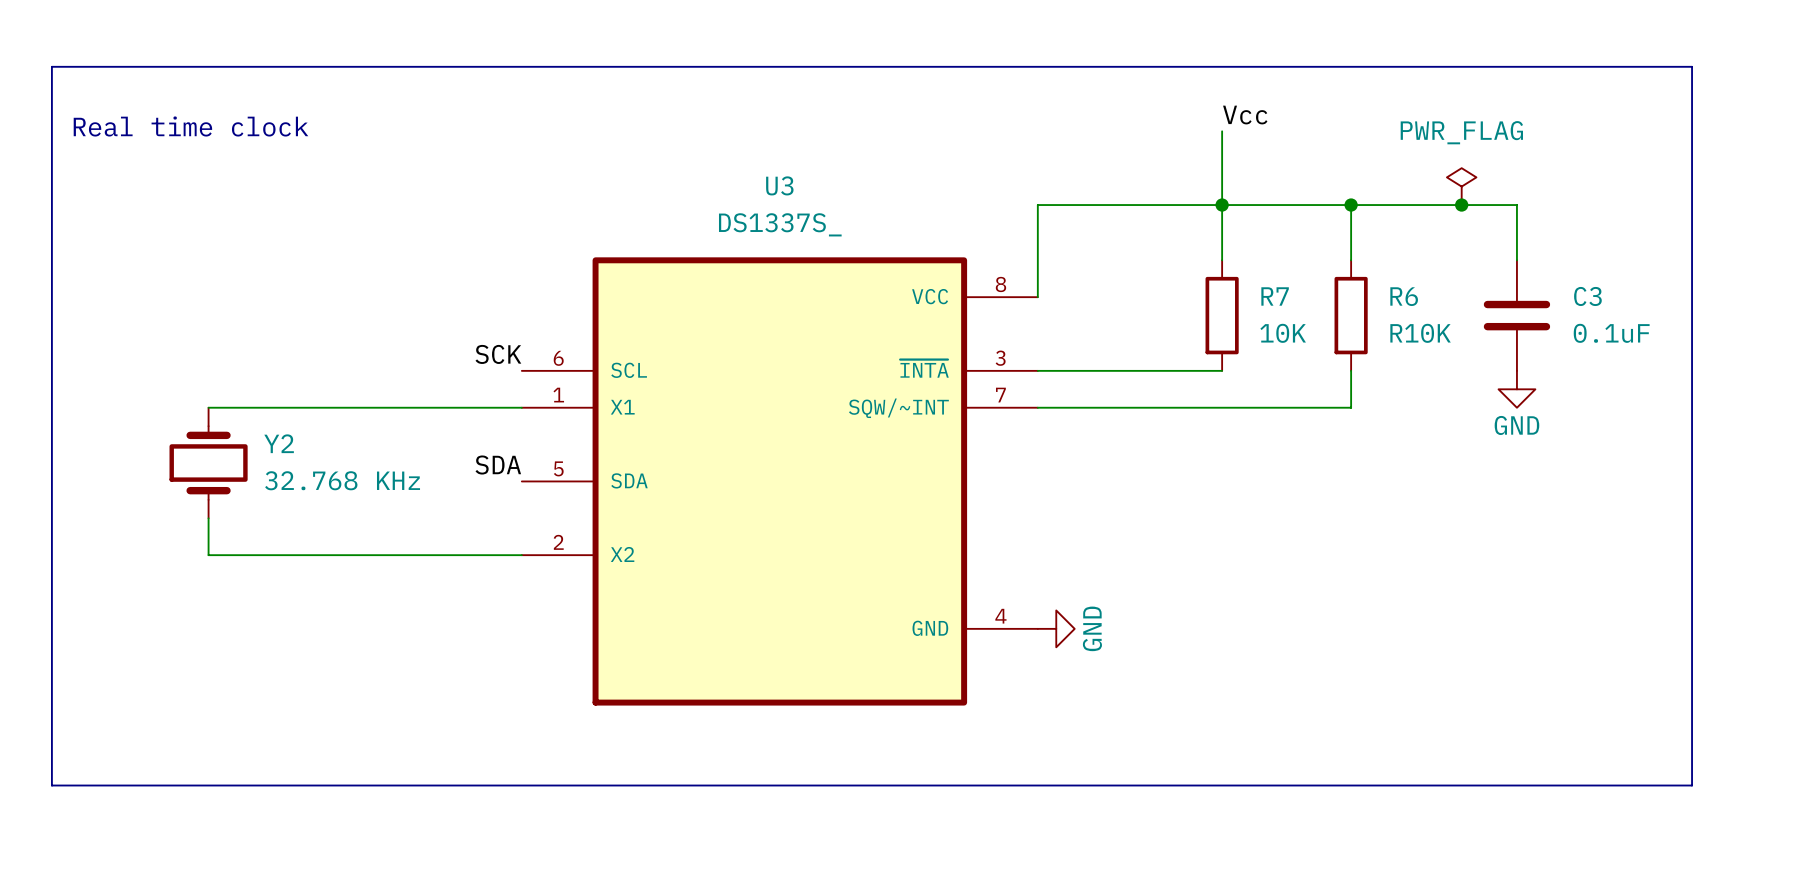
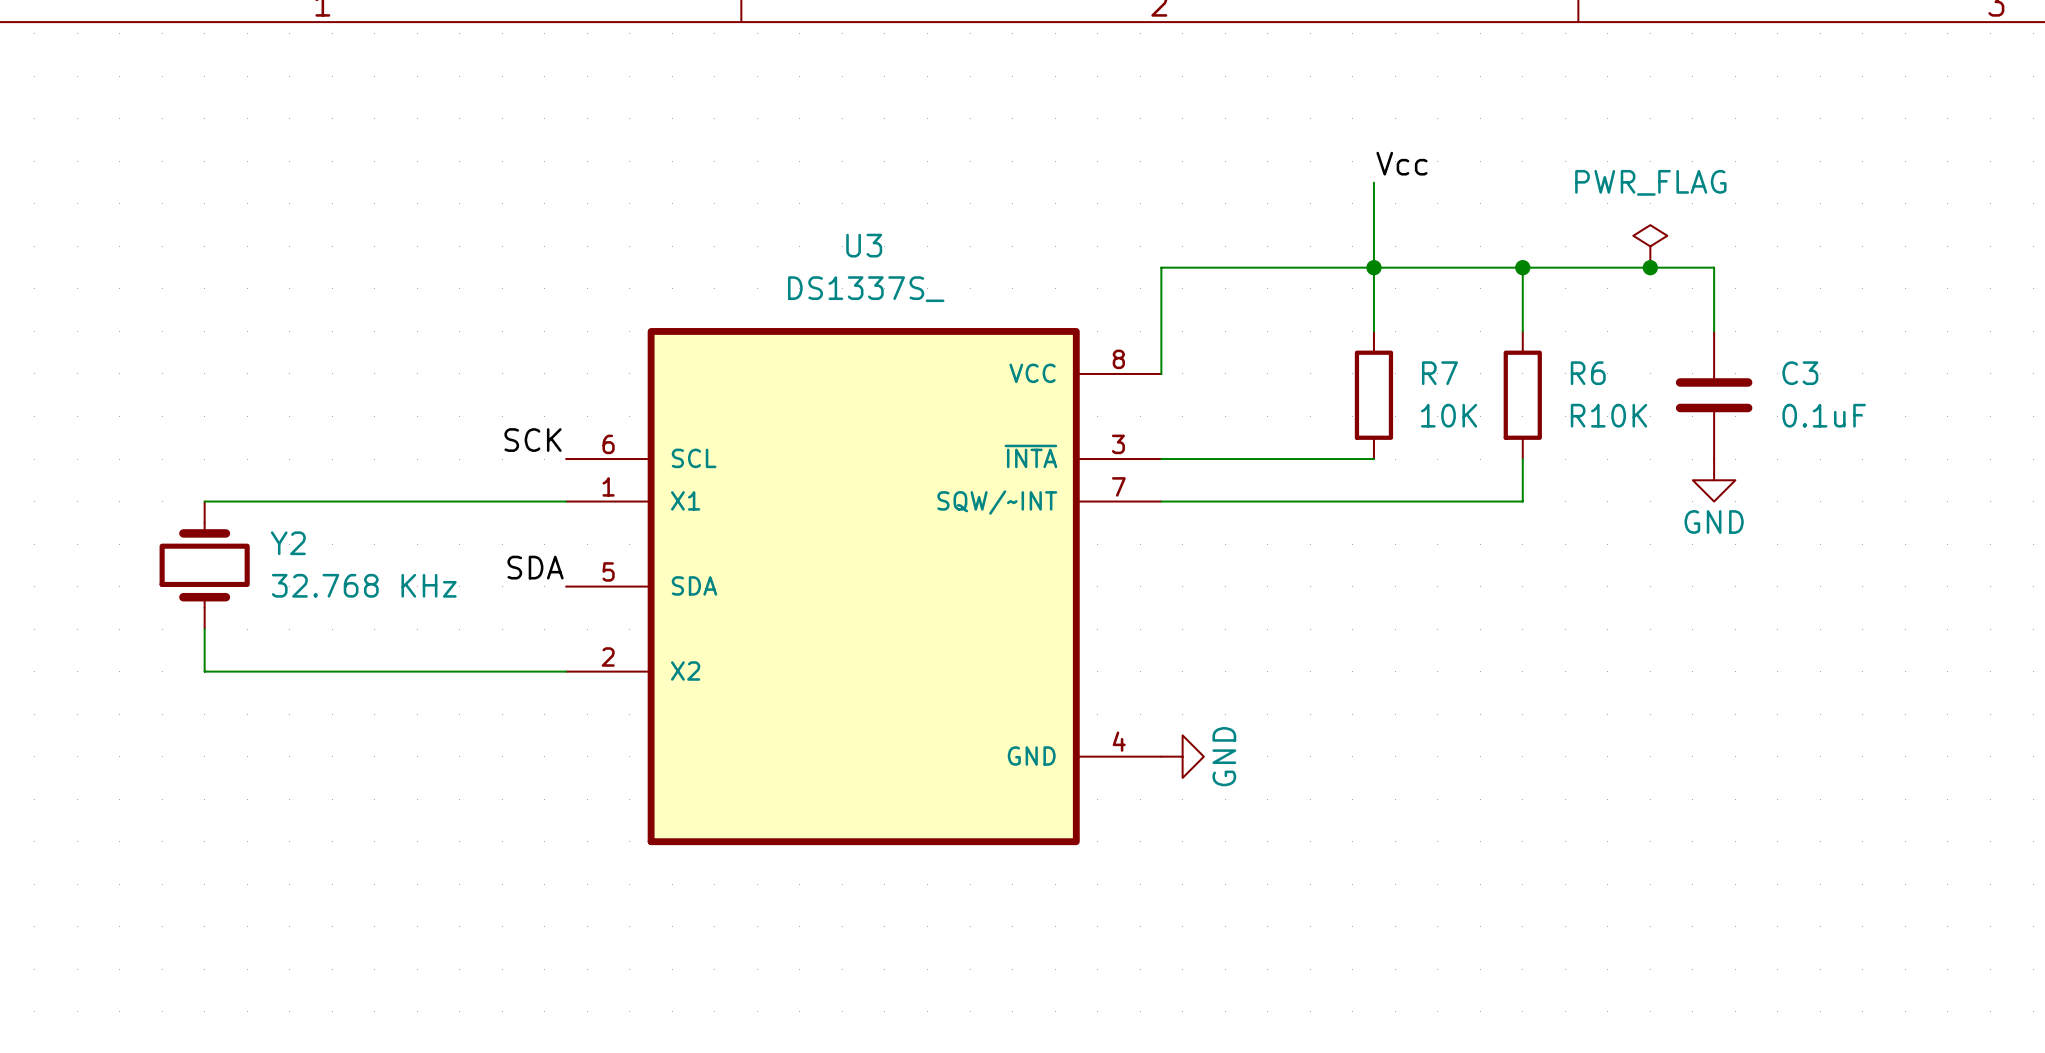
line: (51, 66) (1692, 66) (1692, 785) (51, 785) (51, 66) -> none
text: Real time clock (190, 126) -> none

